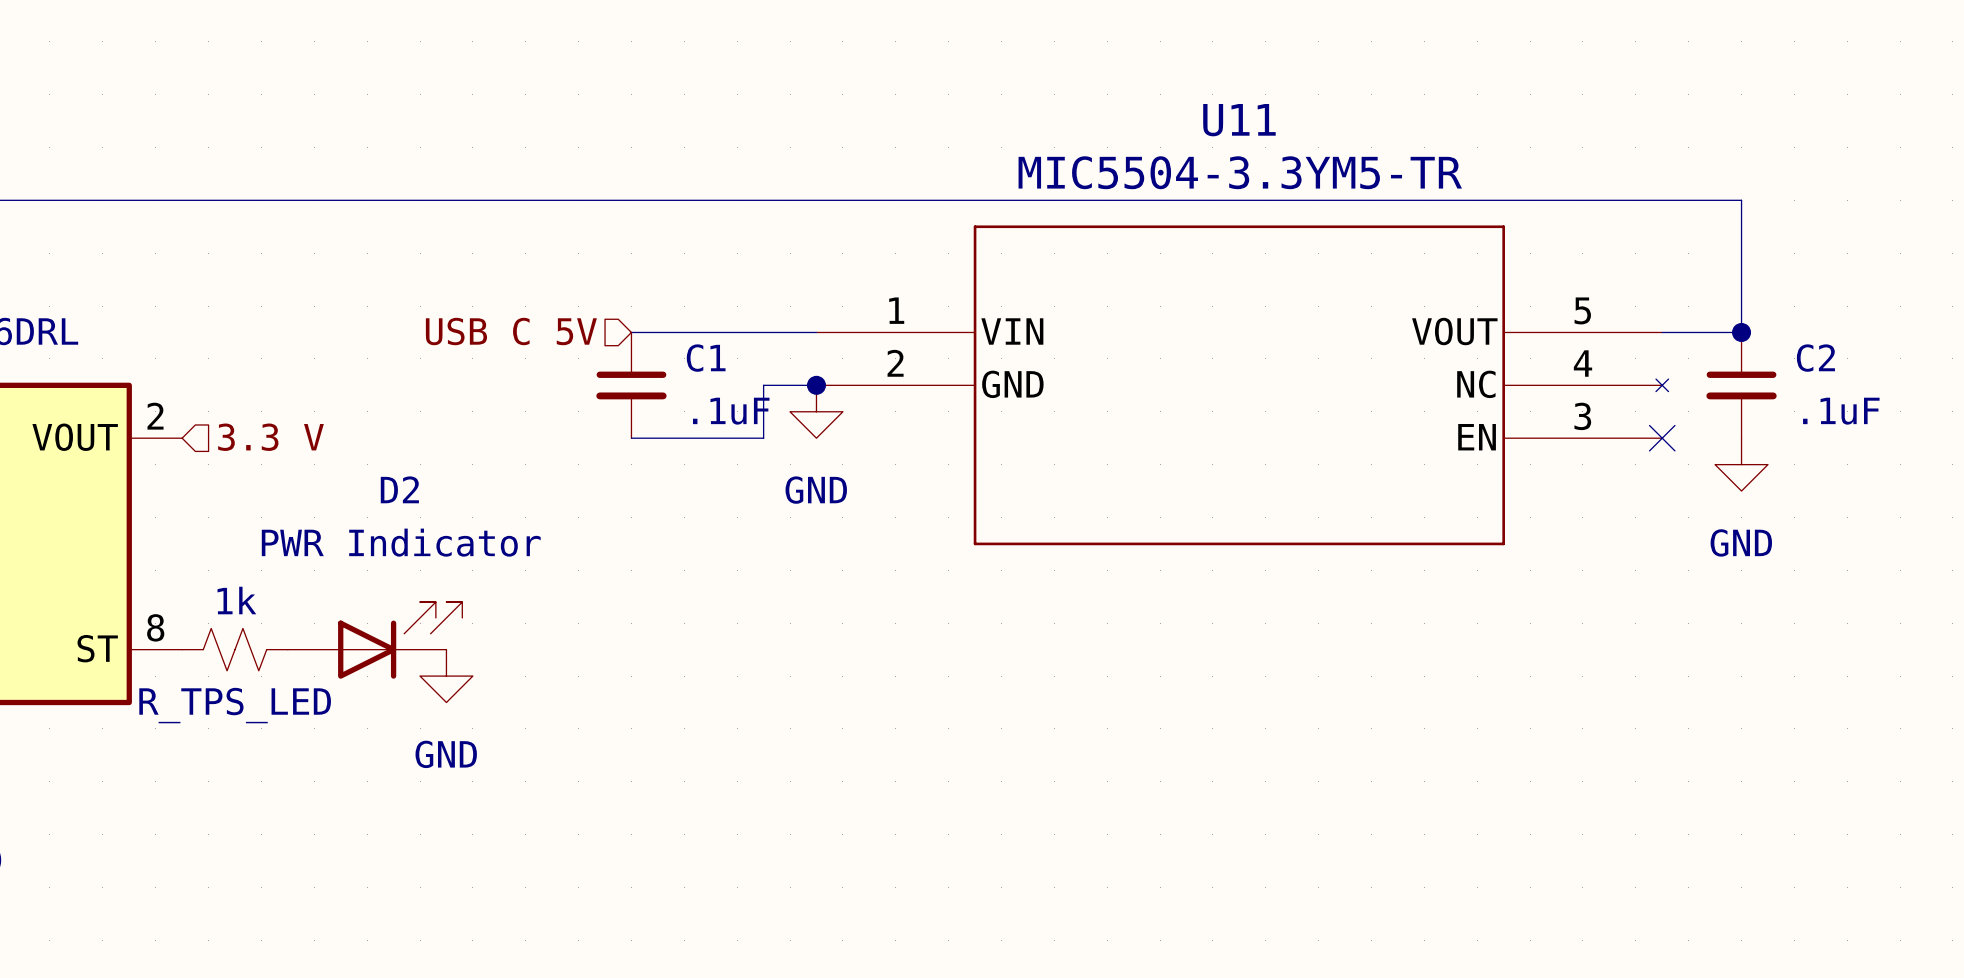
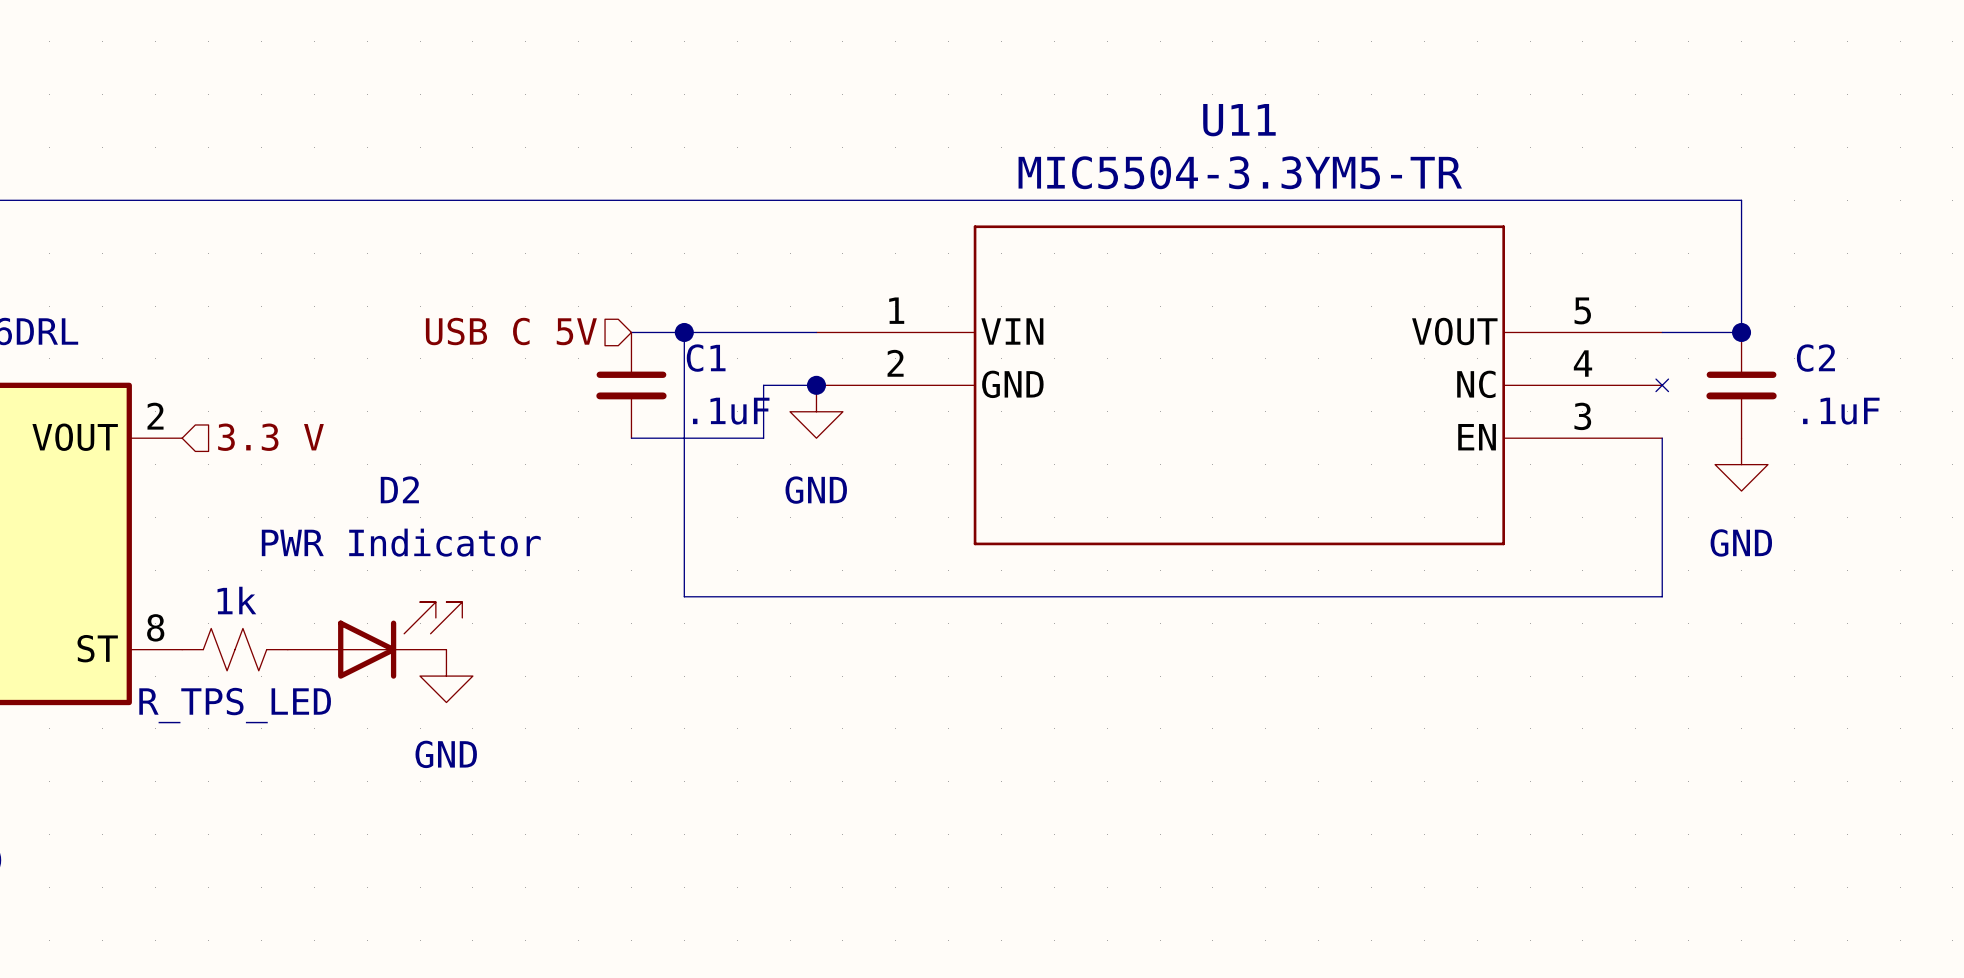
wire: none -> (684, 332) (684, 596) (1662, 596) (1662, 438)
junction: none -> (684, 332)
no-connect mark: (1662, 438) -> none

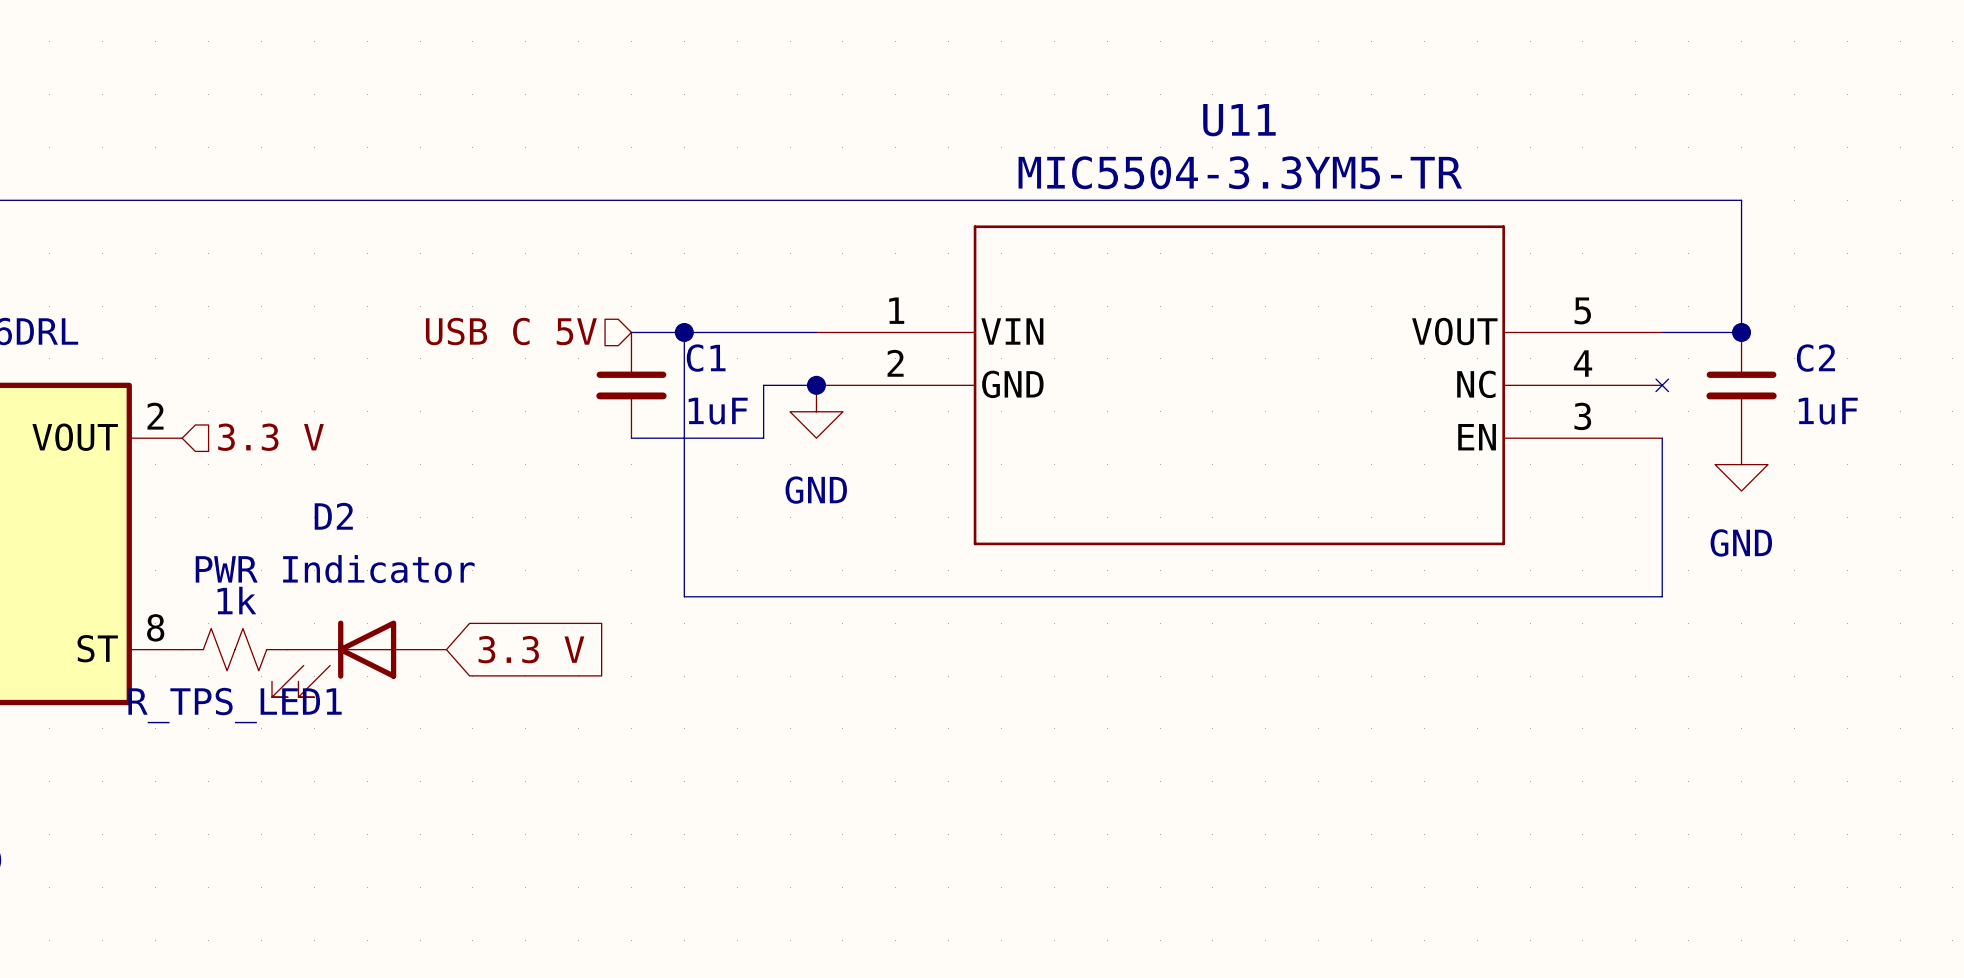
C1 value: .1uF (731, 411) -> 1uF (718, 411)
C2 value: .1uF (1841, 411) -> 1uF (1828, 411)
D2 name position: D2 (399, 489) -> D2 (333, 516)
D2 value position: PWR Indicator (401, 542) -> PWR Indicator (335, 569)
D2 rotation: 0° (400, 640) -> 180° (334, 658)
global label: none -> 3.3 V (531, 649)
power symbol: GND (446, 676) -> none
R_TPS_LED name: R_TPS_LED (235, 705) -> R_TPS_LED1 (235, 705)

